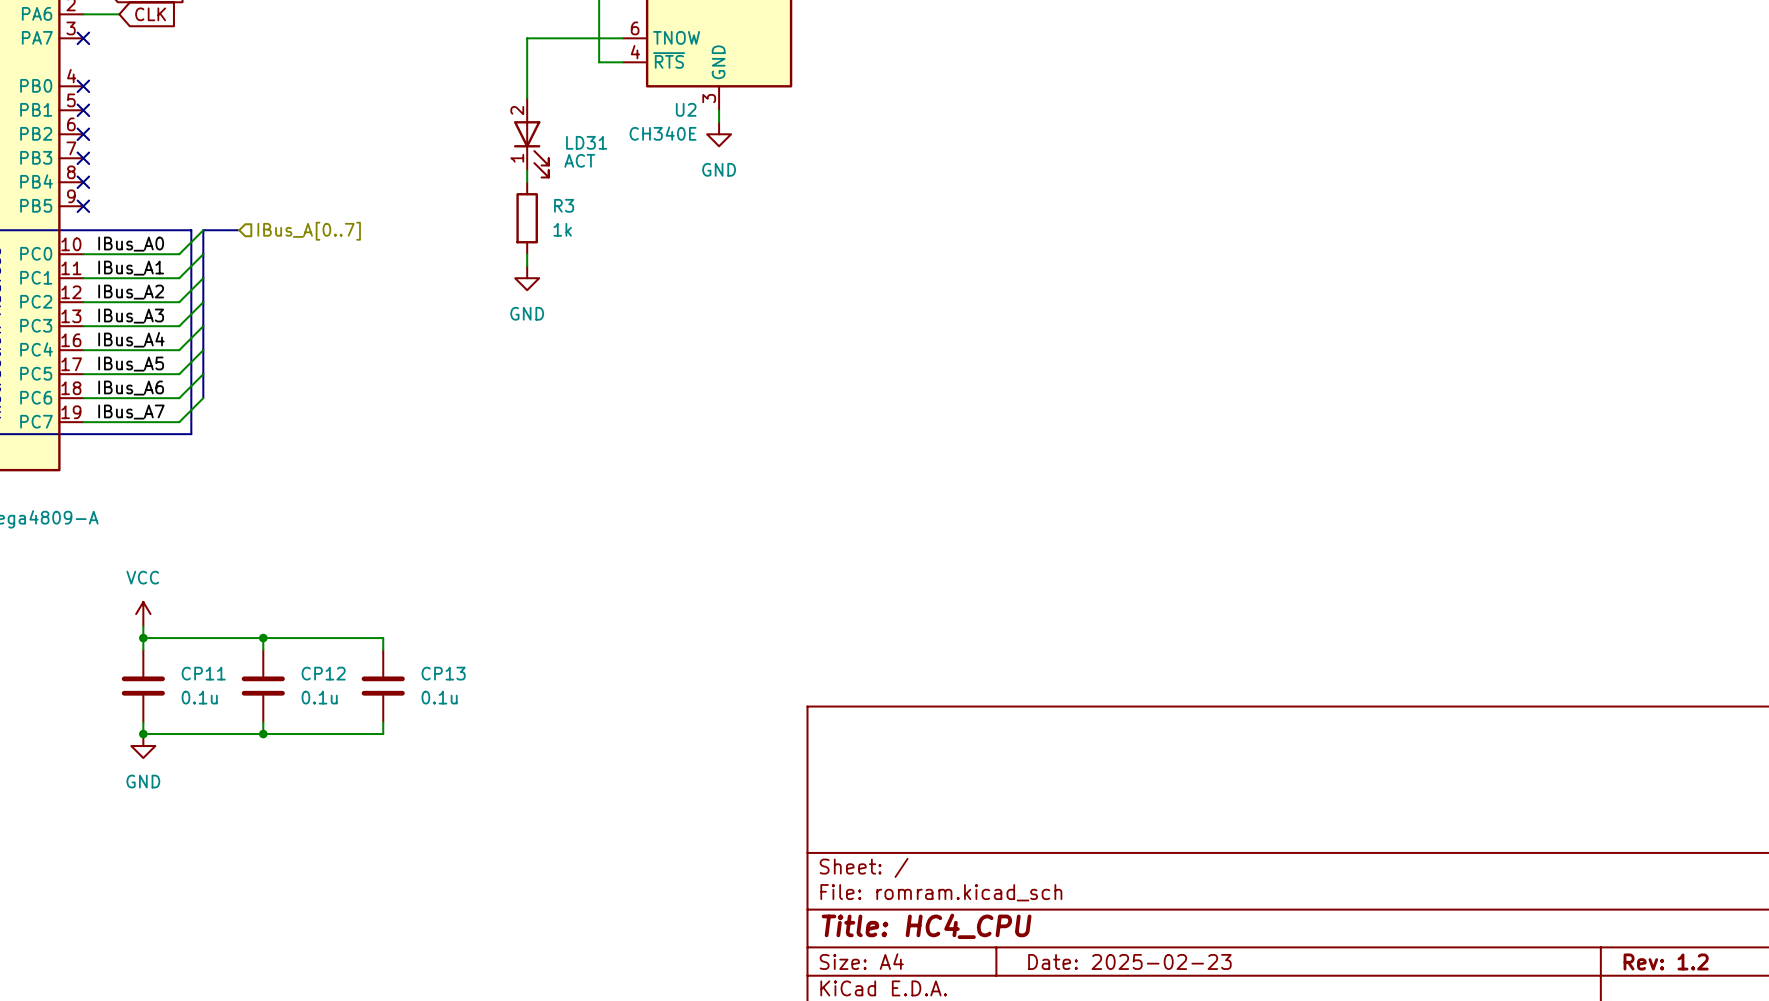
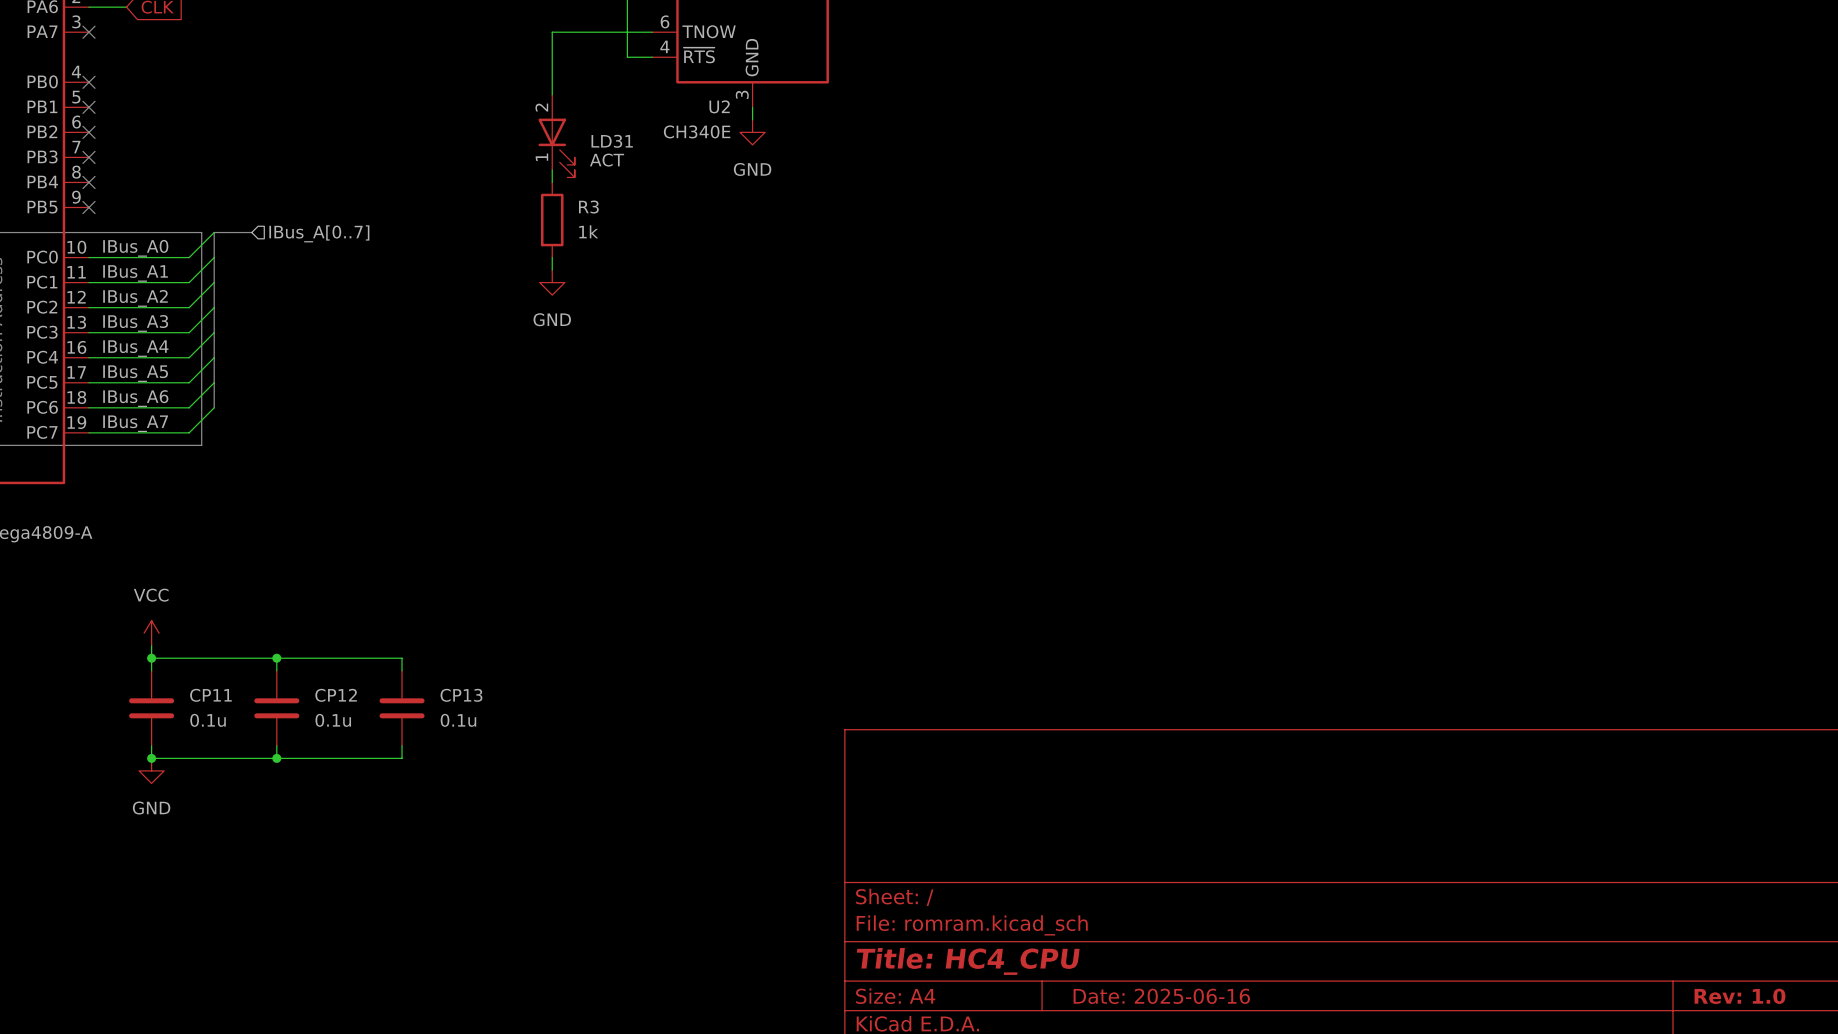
title block: Date: 2025-02-23 (1129, 961) -> Date: 2025-06-16 (1161, 996)
title block: Rev: 1.2 (1666, 961) -> Rev: 1.0 (1740, 996)

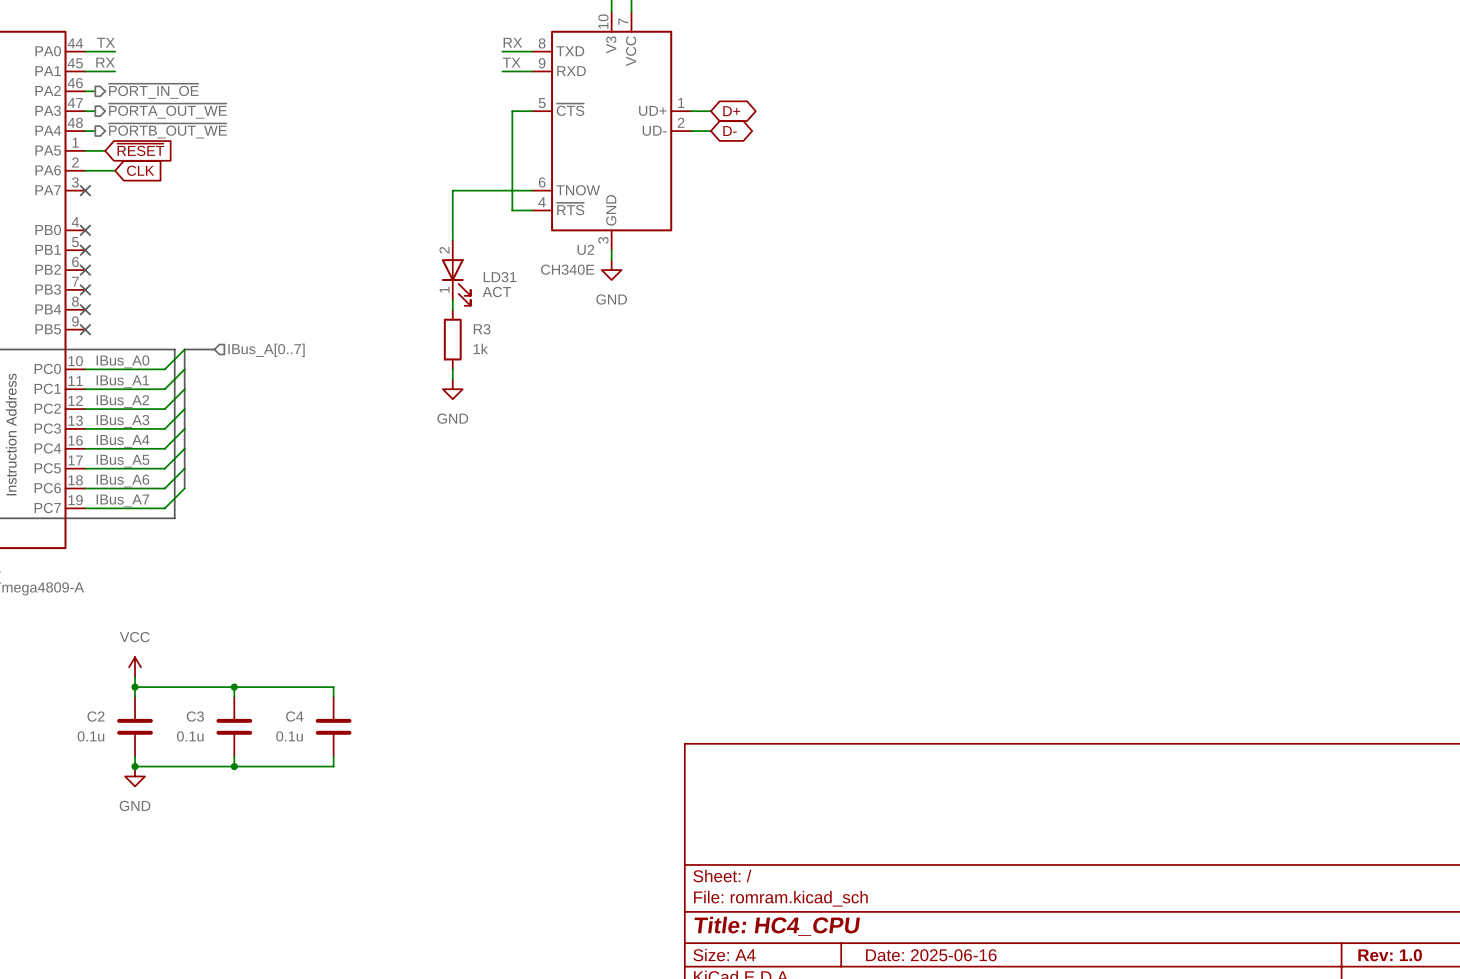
CP11 name: CP11 (210, 695) -> C2 (96, 716)
CP12 name: CP12 (336, 695) -> C3 (195, 716)
CP13 name: CP13 (461, 695) -> C4 (294, 716)
CP11 value position: 0.1u (208, 720) -> 0.1u (90, 736)
CP12 value position: 0.1u (333, 720) -> 0.1u (190, 736)
CP13 value position: 0.1u (458, 720) -> 0.1u (289, 736)

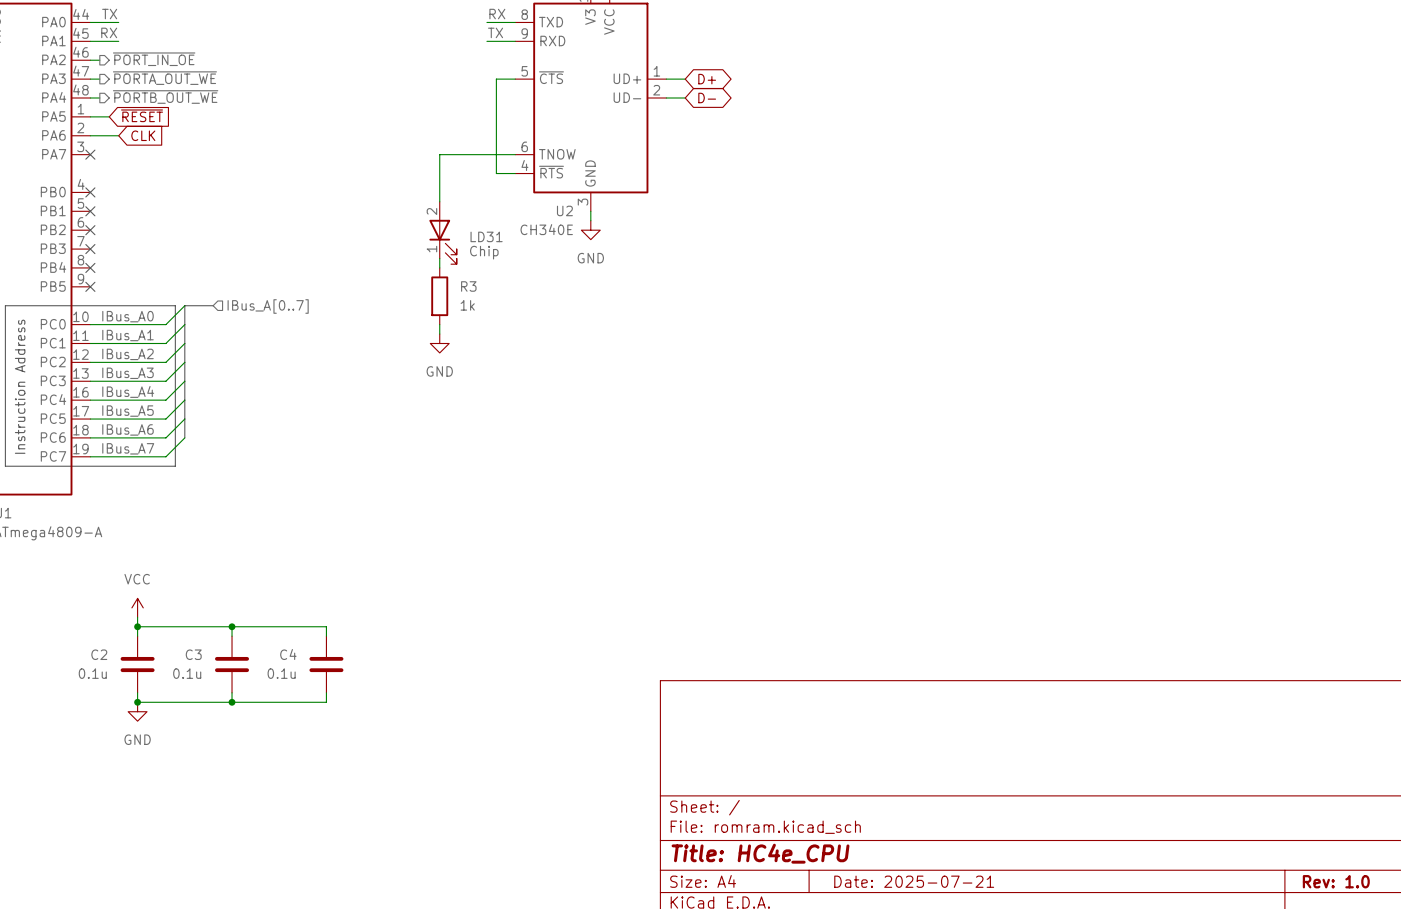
LD31 value: ACT (496, 292) -> Chip (484, 252)
title block: Title: HC4_CPU (777, 926) -> Title: HC4e_CPU (760, 853)
title block: Date: 2025-06-16 (931, 955) -> Date: 2025-07-21 (914, 881)

